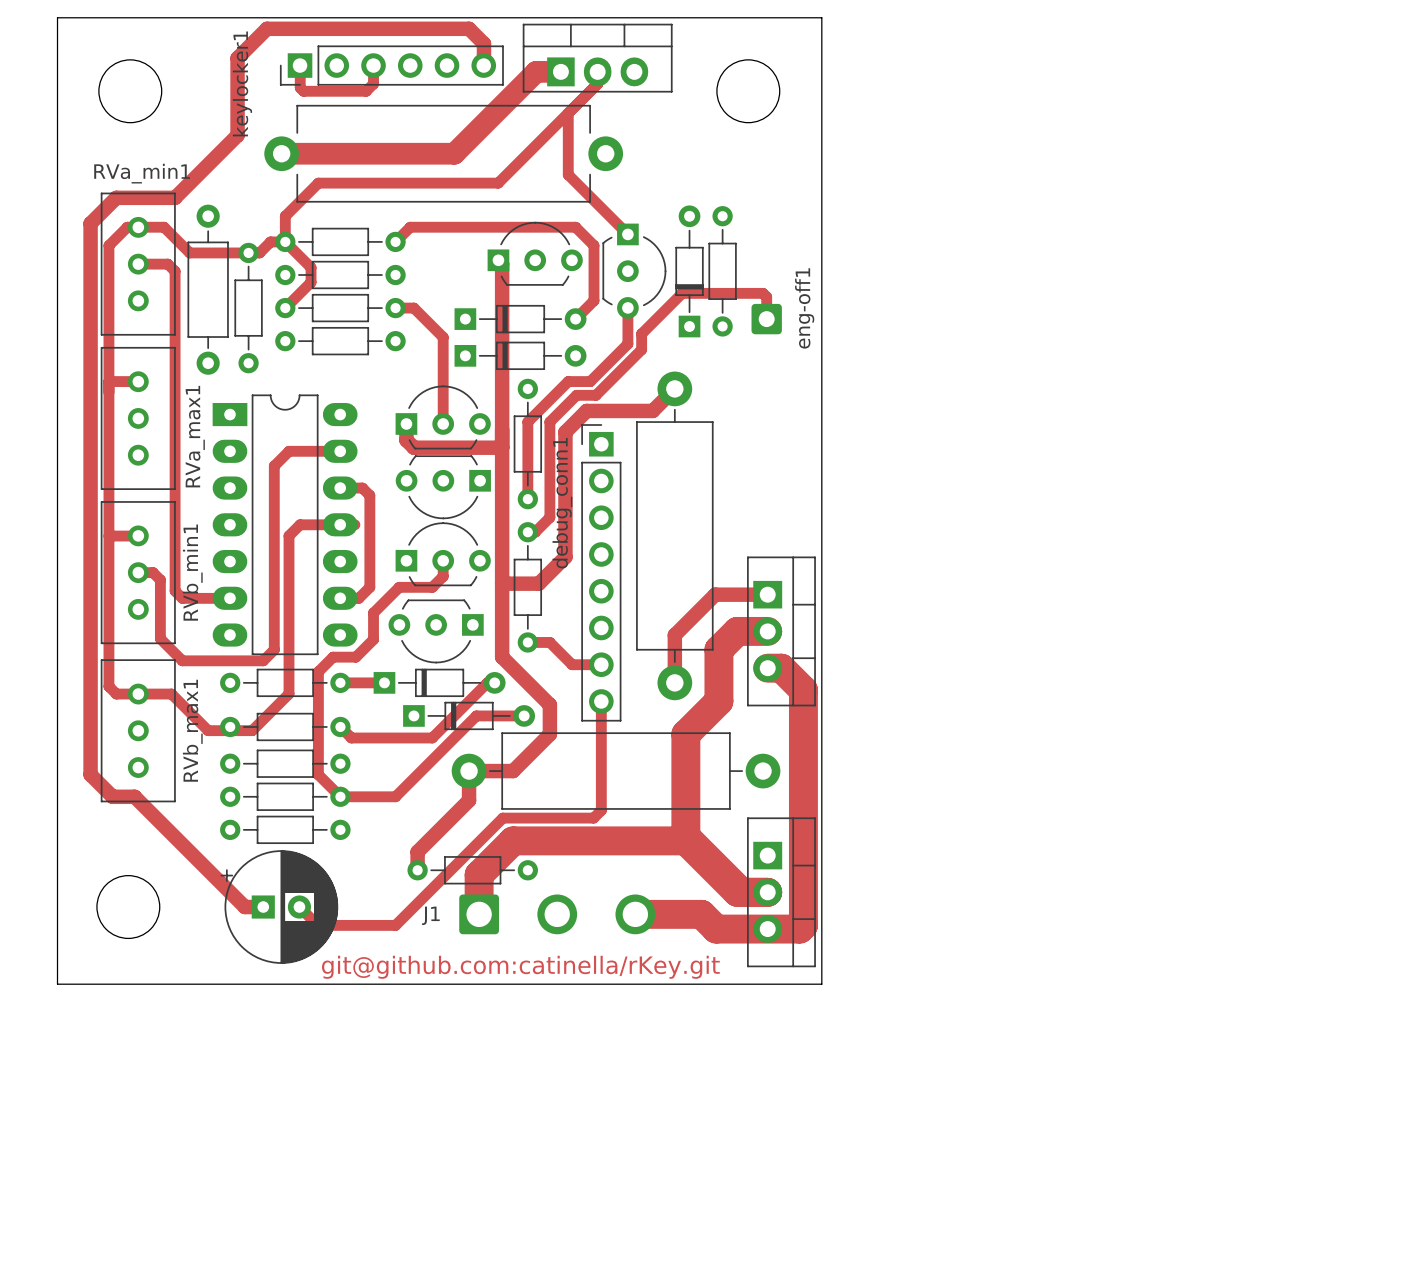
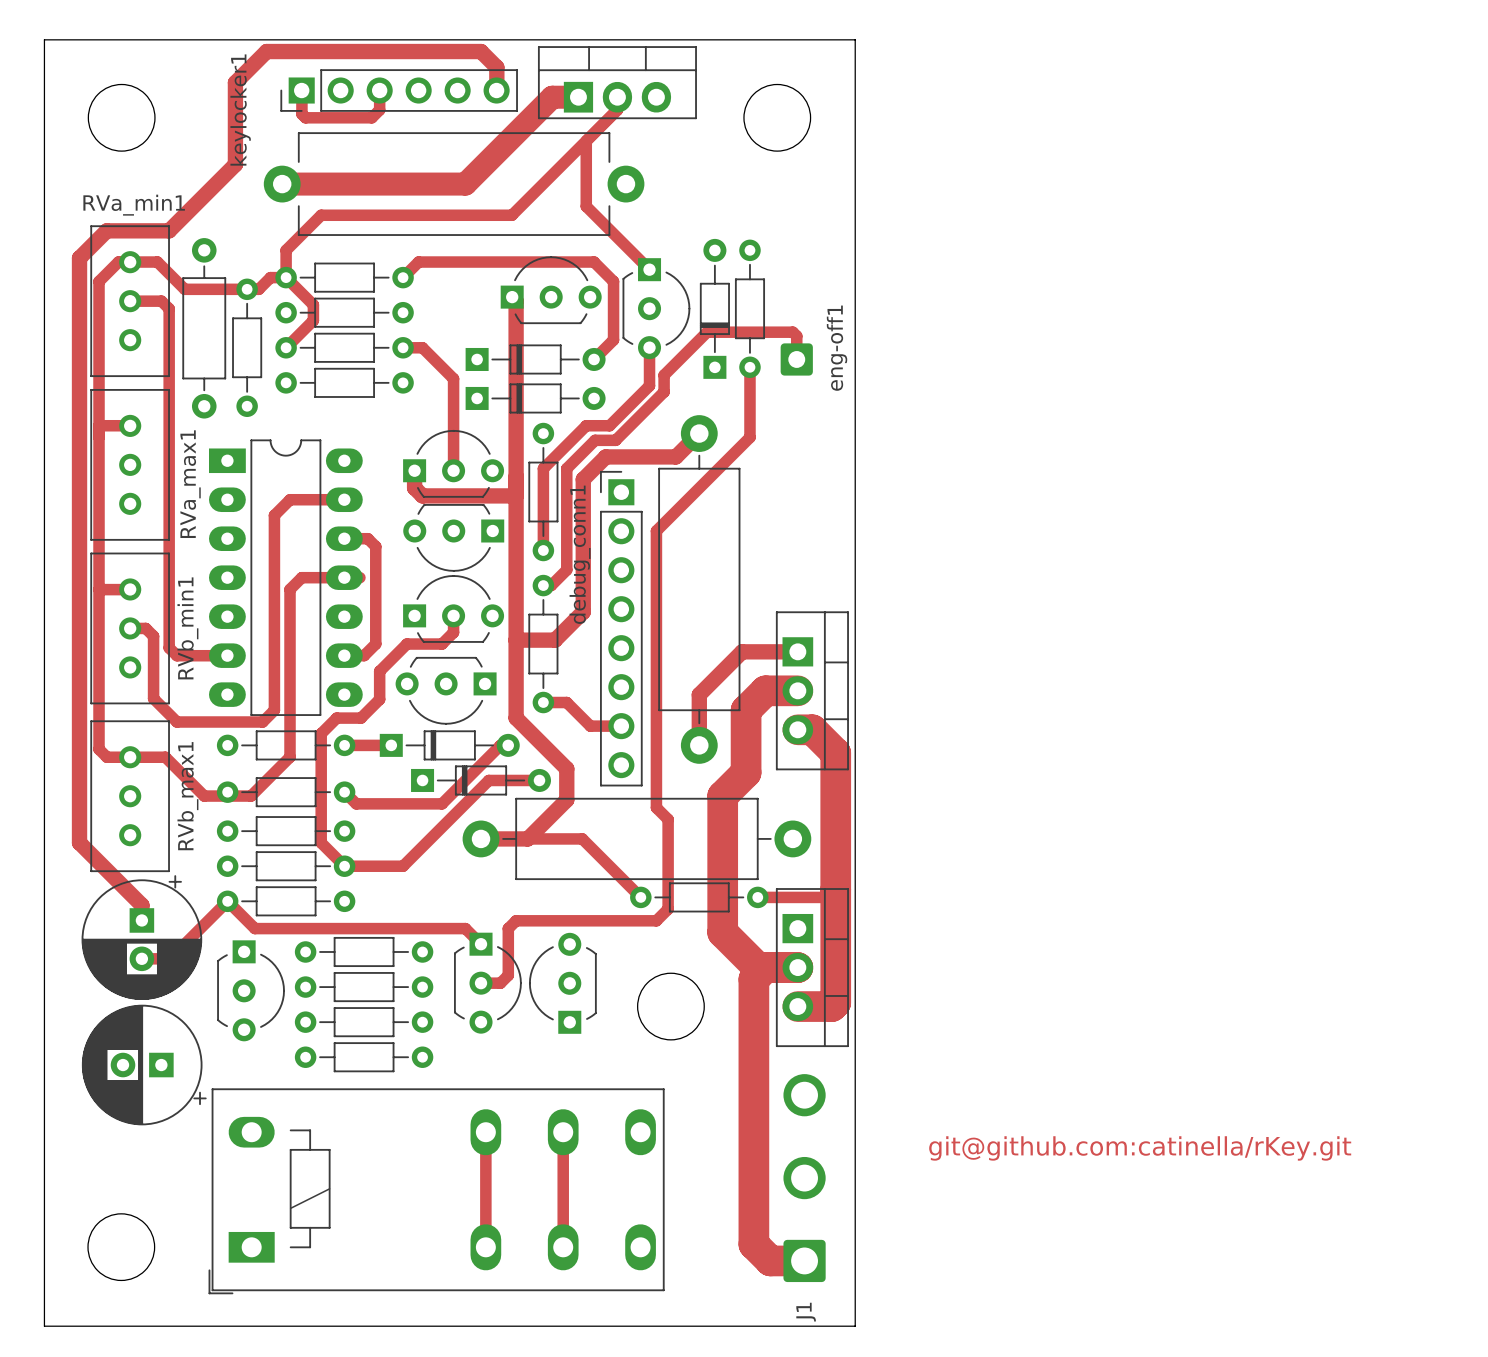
track: none -> (749, 367) (749, 437) (656, 530) (656, 807) (668, 819) (668, 909) (656, 920) (516, 920) (508, 928) (508, 975) (500, 983) (481, 983)
track: (601, 701) (601, 810) (593, 818) (502, 818) (395, 925) (317, 925) (299, 907) -> none
track: (718, 701) (685, 734) (685, 836) (741, 892) -> (746, 764) (746, 772) (722, 796) (722, 932) (757, 967) (765, 967) (753, 979) (753, 1244) (770, 1260) (804, 1260)
track: (469, 771) (469, 800) (417, 851) (417, 870) -> (481, 838) (582, 838) (640, 897)
track: (112, 796) (134, 796) (244, 907) (263, 907) -> (102, 866) (141, 905) (141, 920)
track: none -> (835, 889) (827, 897) (757, 897)
part: none -> (699, 897)
part: none -> (141, 937)
track: none -> (481, 944) (465, 928) (254, 928) (227, 901) (170, 958) (141, 958)
part: (472, 870) -> none
part: none -> (364, 951)
track: (737, 892) (685, 840) (513, 840) (479, 874) (479, 914) -> none
round board edge: none -> [637, 972, 705, 1041]
round board edge position: (128, 907) -> (121, 1247)
part: (279, 907) -> none
part: none -> (487, 983)
part: none -> (562, 983)
part: none -> (364, 987)
part: none -> (251, 990)
J1 rotation: 0° (557, 914) -> 90° counterclockwise (804, 1178)
J1 position: (557, 914) -> (804, 1178)
track: (635, 914) (701, 914) (716, 929) (767, 929) -> none
part: none -> (364, 1022)
text: git@github.com:catinella/rKey.git (520, 967) -> none
part: none -> (364, 1057)
board edge: (57, 984) (821, 984) -> (44, 1065) (44, 1326) (855, 1326) (855, 1065)
part: none -> (144, 1065)
track: none -> (485, 1132) (485, 1247)
track: none -> (563, 1132) (563, 1247)
text: none -> git@github.com:catinella/rKey.git (1140, 1148)
part: none -> (436, 1191)

